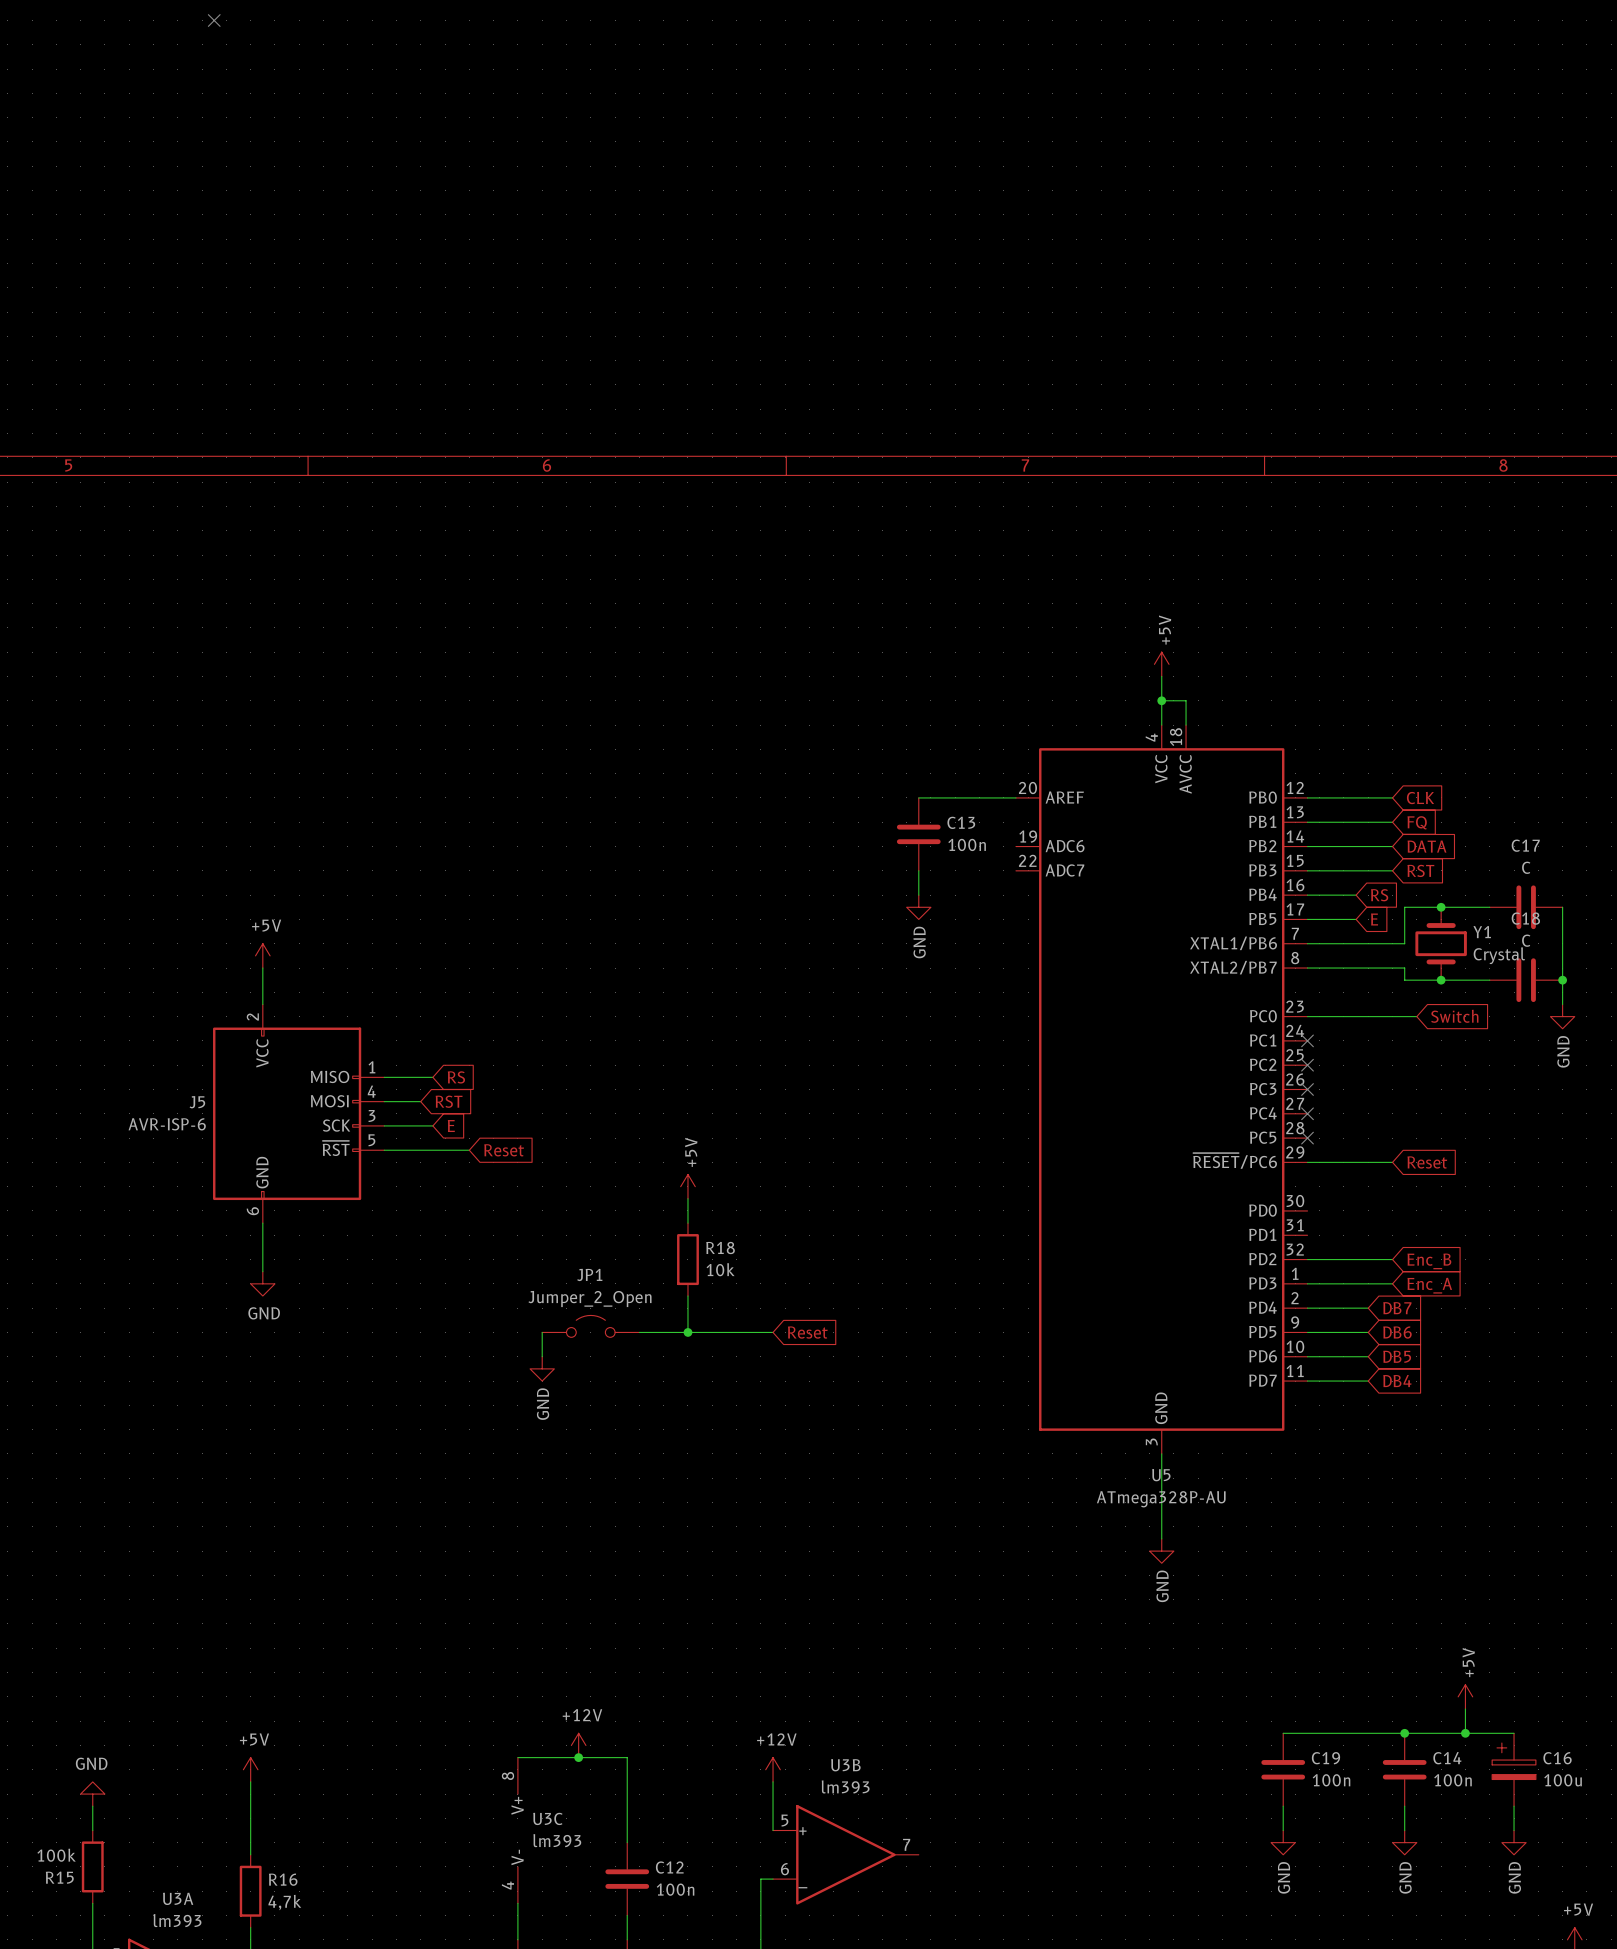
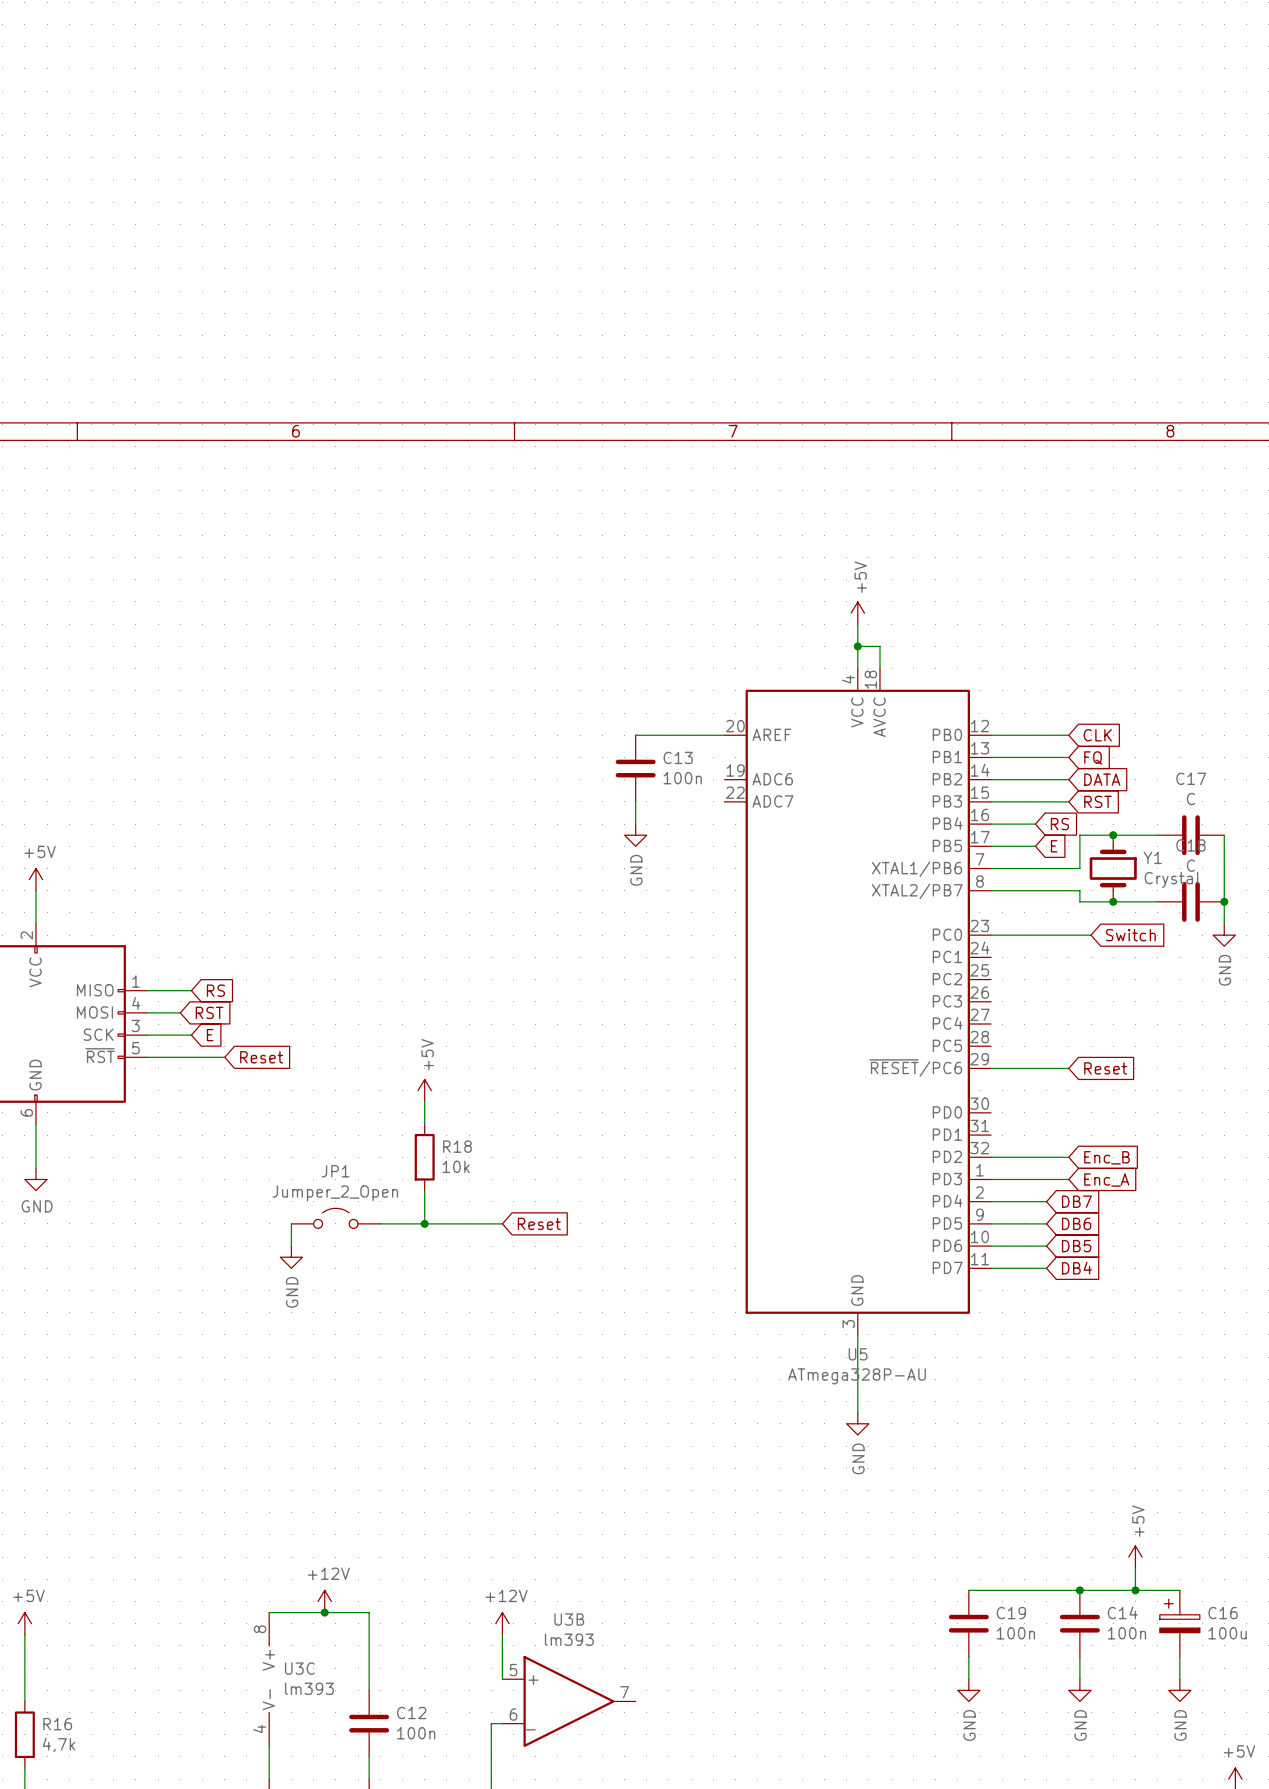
no-connect mark: (1307, 1040) -> none
no-connect mark: (1307, 1065) -> none
no-connect mark: (1307, 1089) -> none
no-connect mark: (1307, 1113) -> none
no-connect mark: (1307, 1138) -> none

